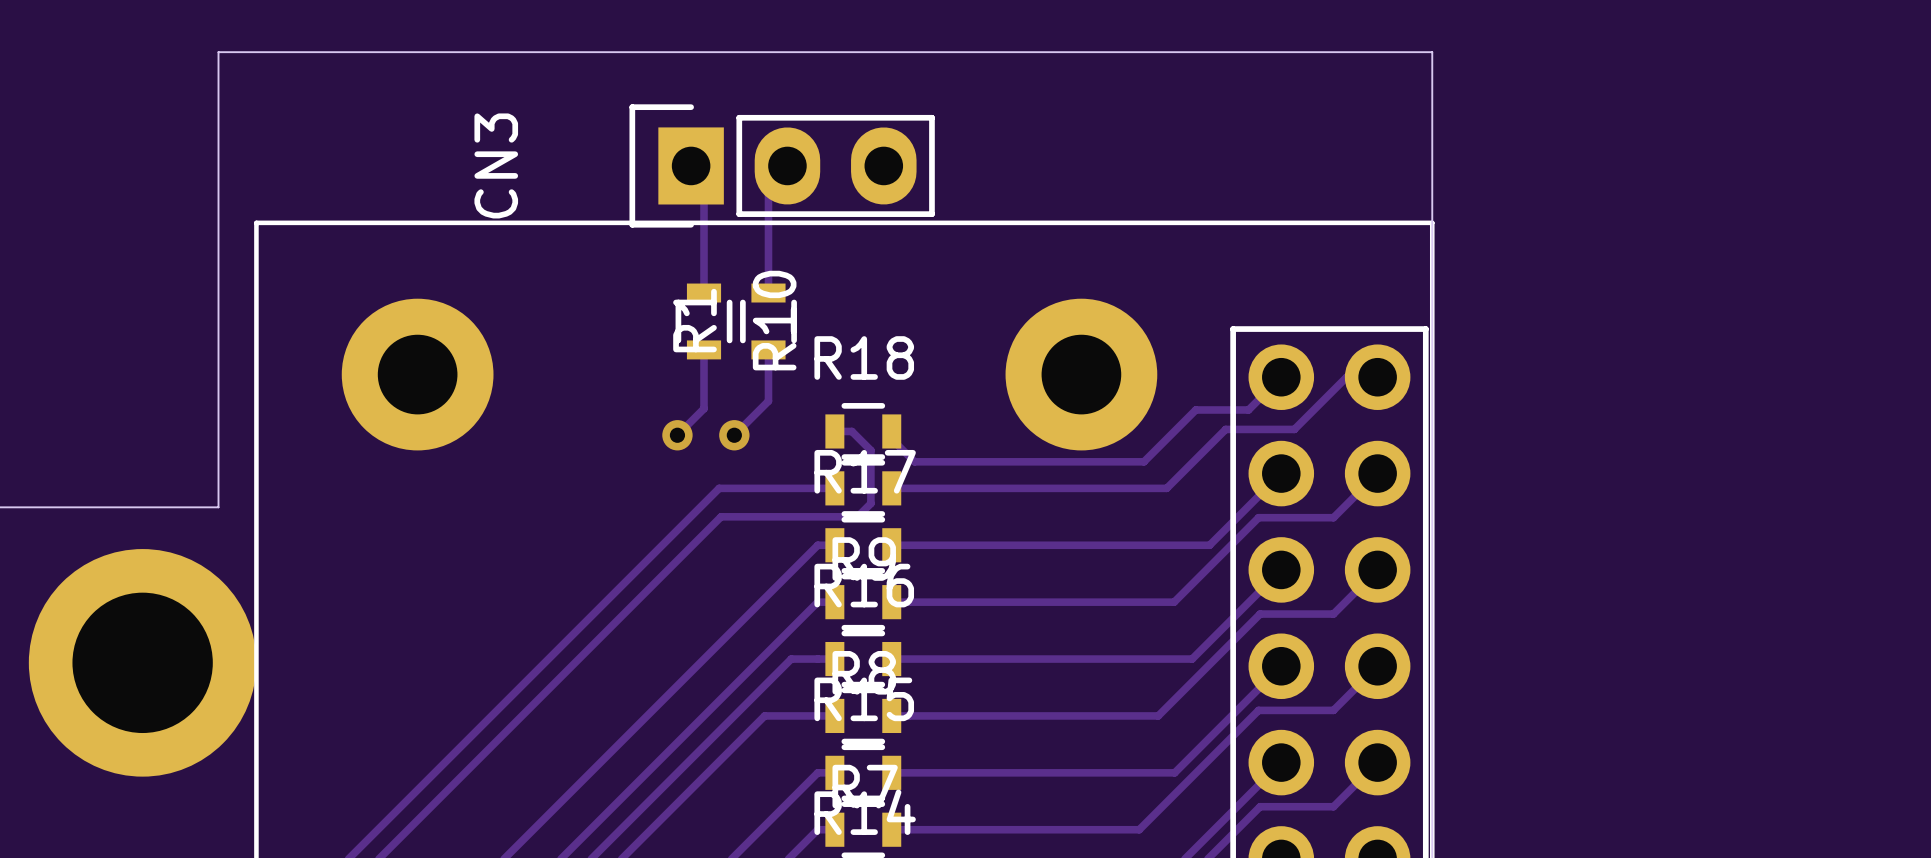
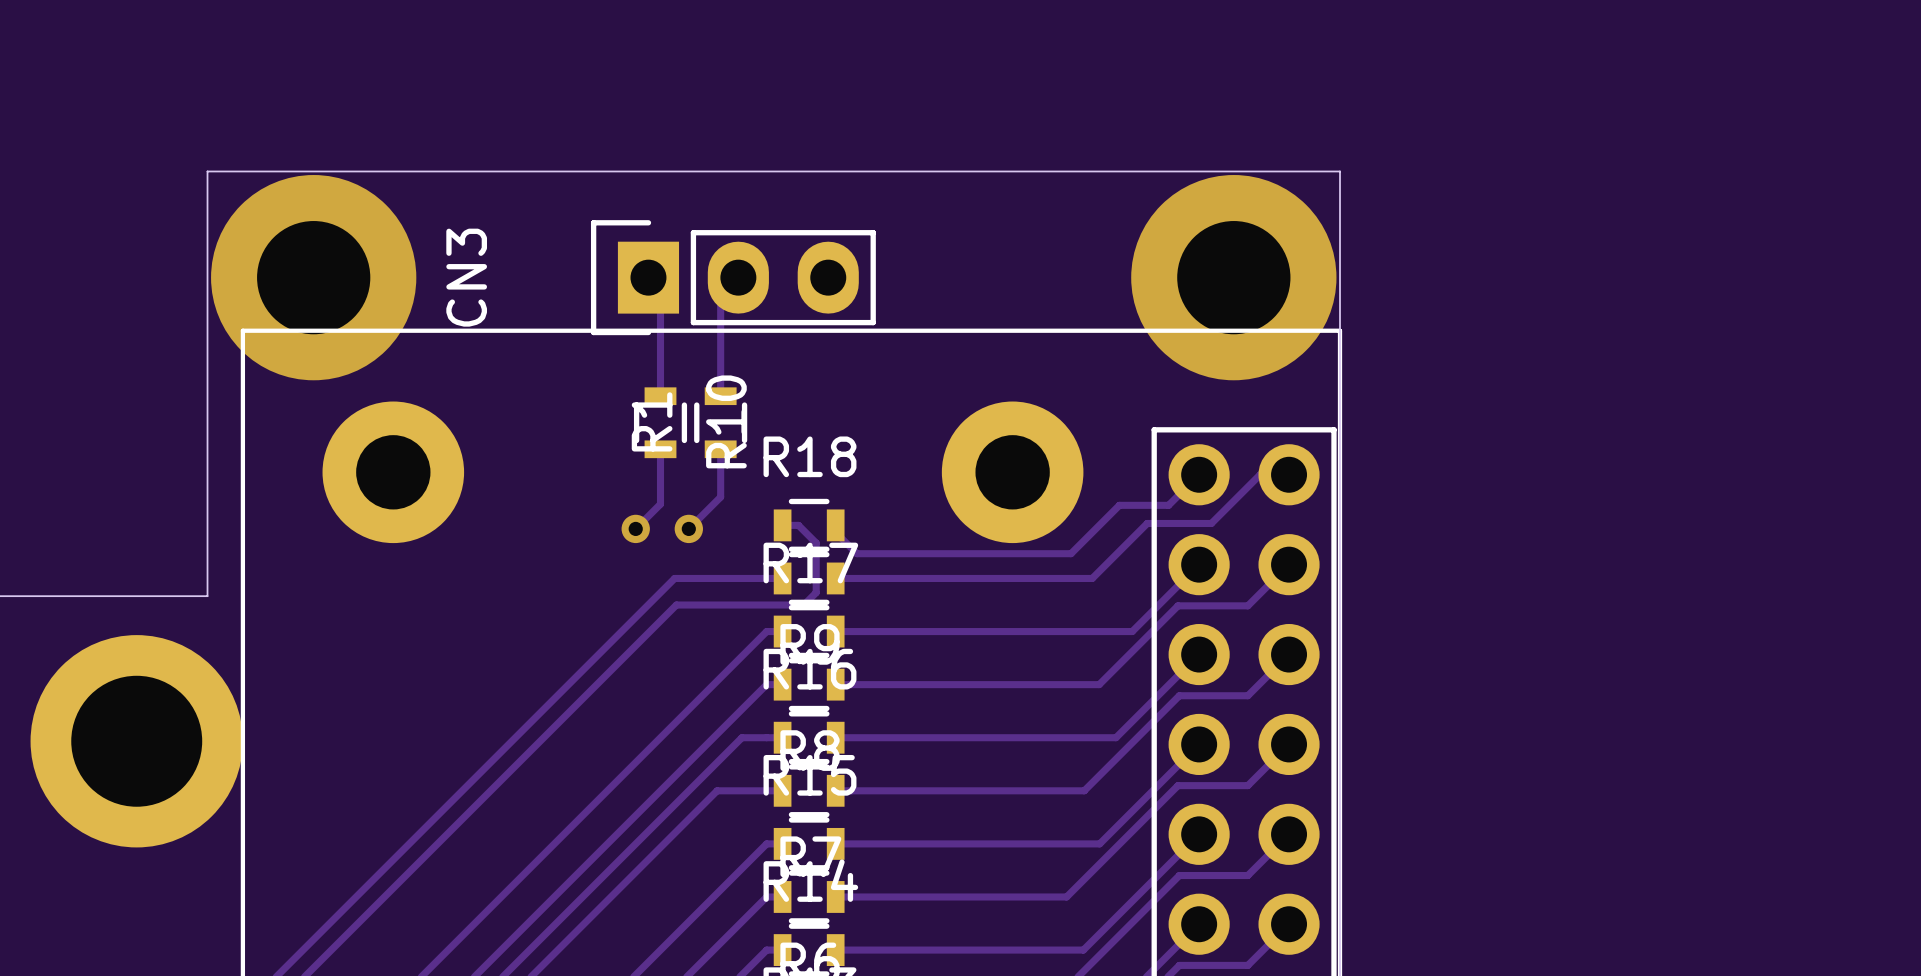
via: none -> (313, 277)
via: none -> (1233, 277)

